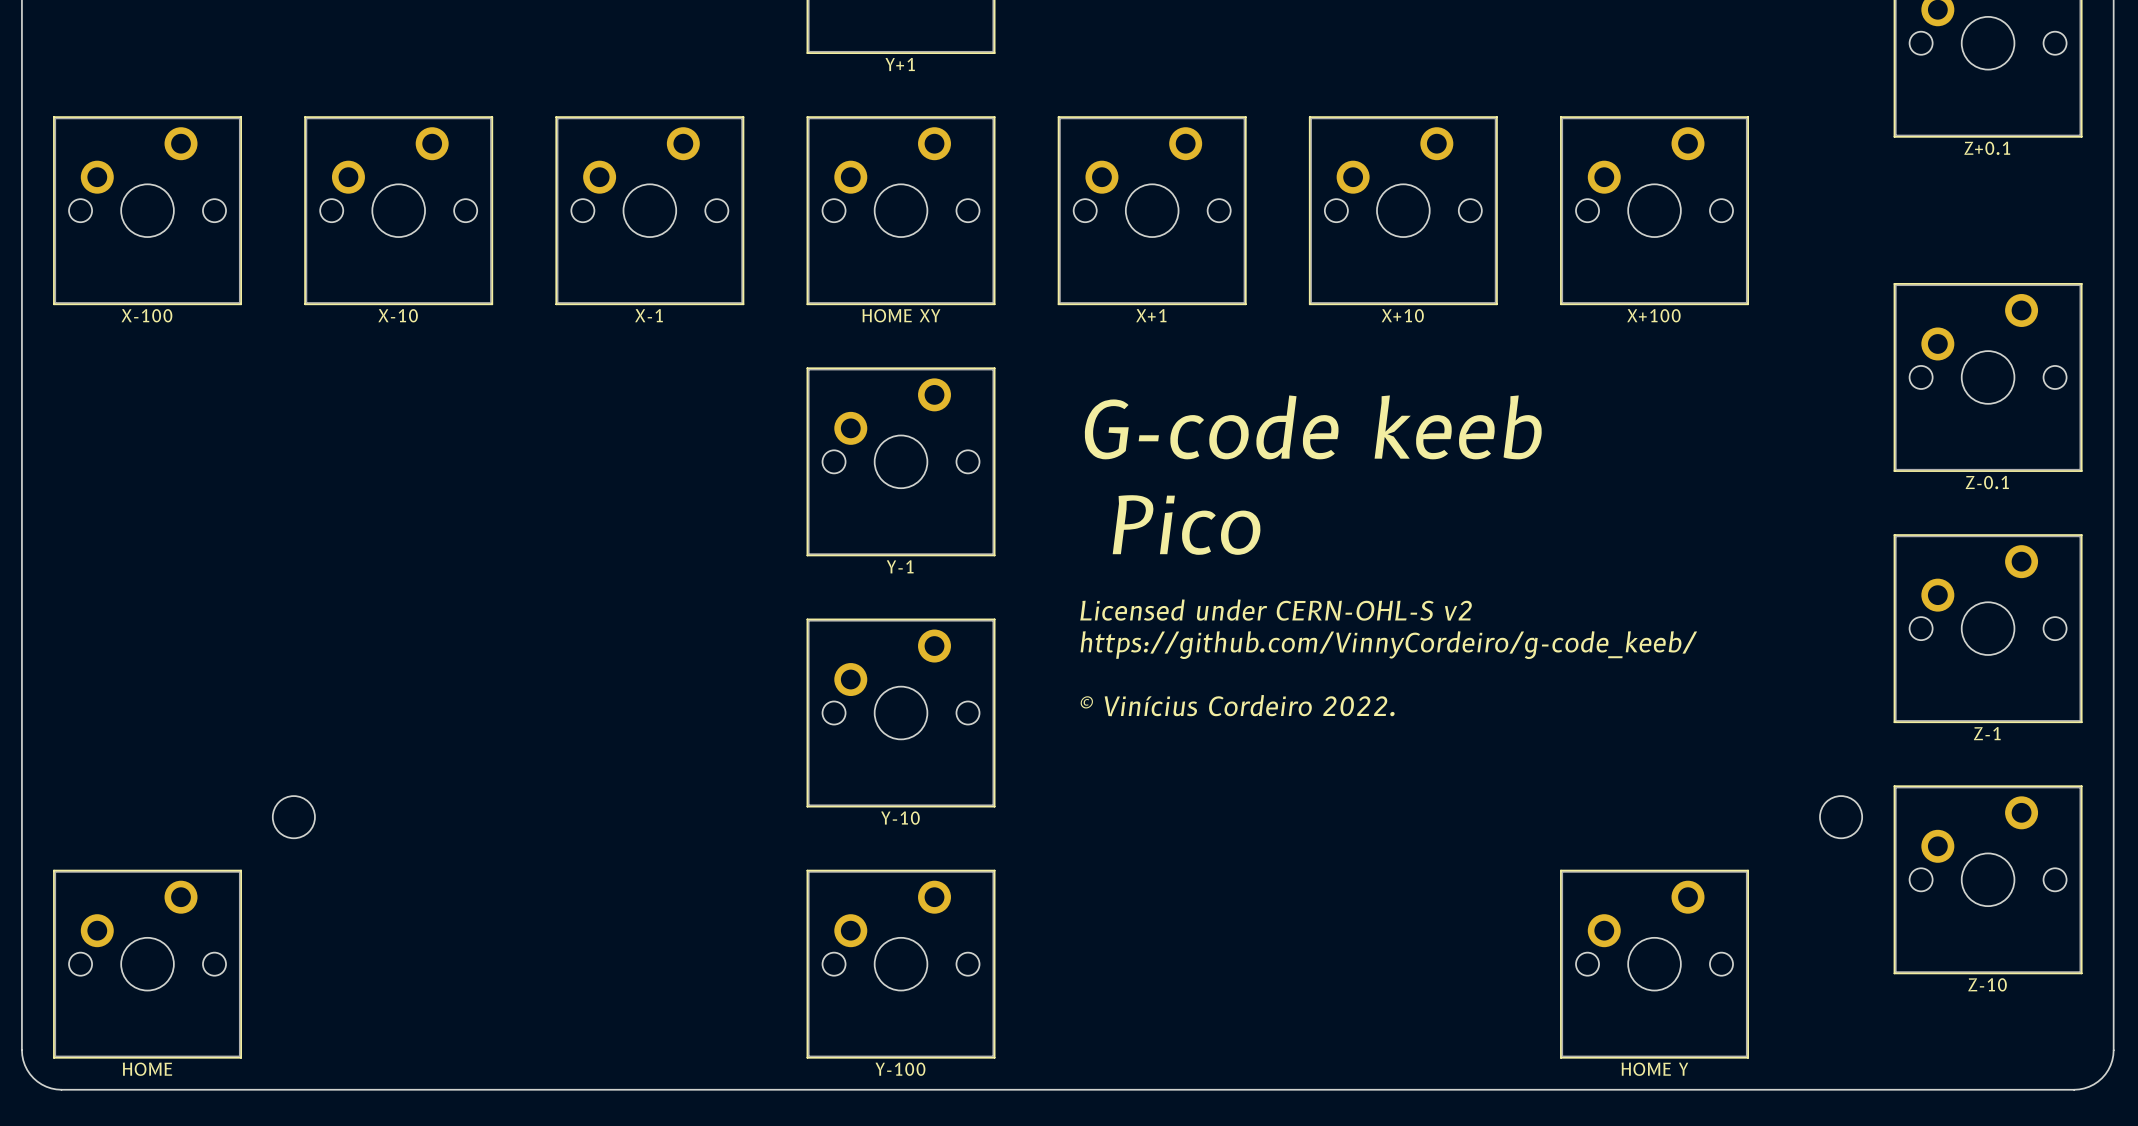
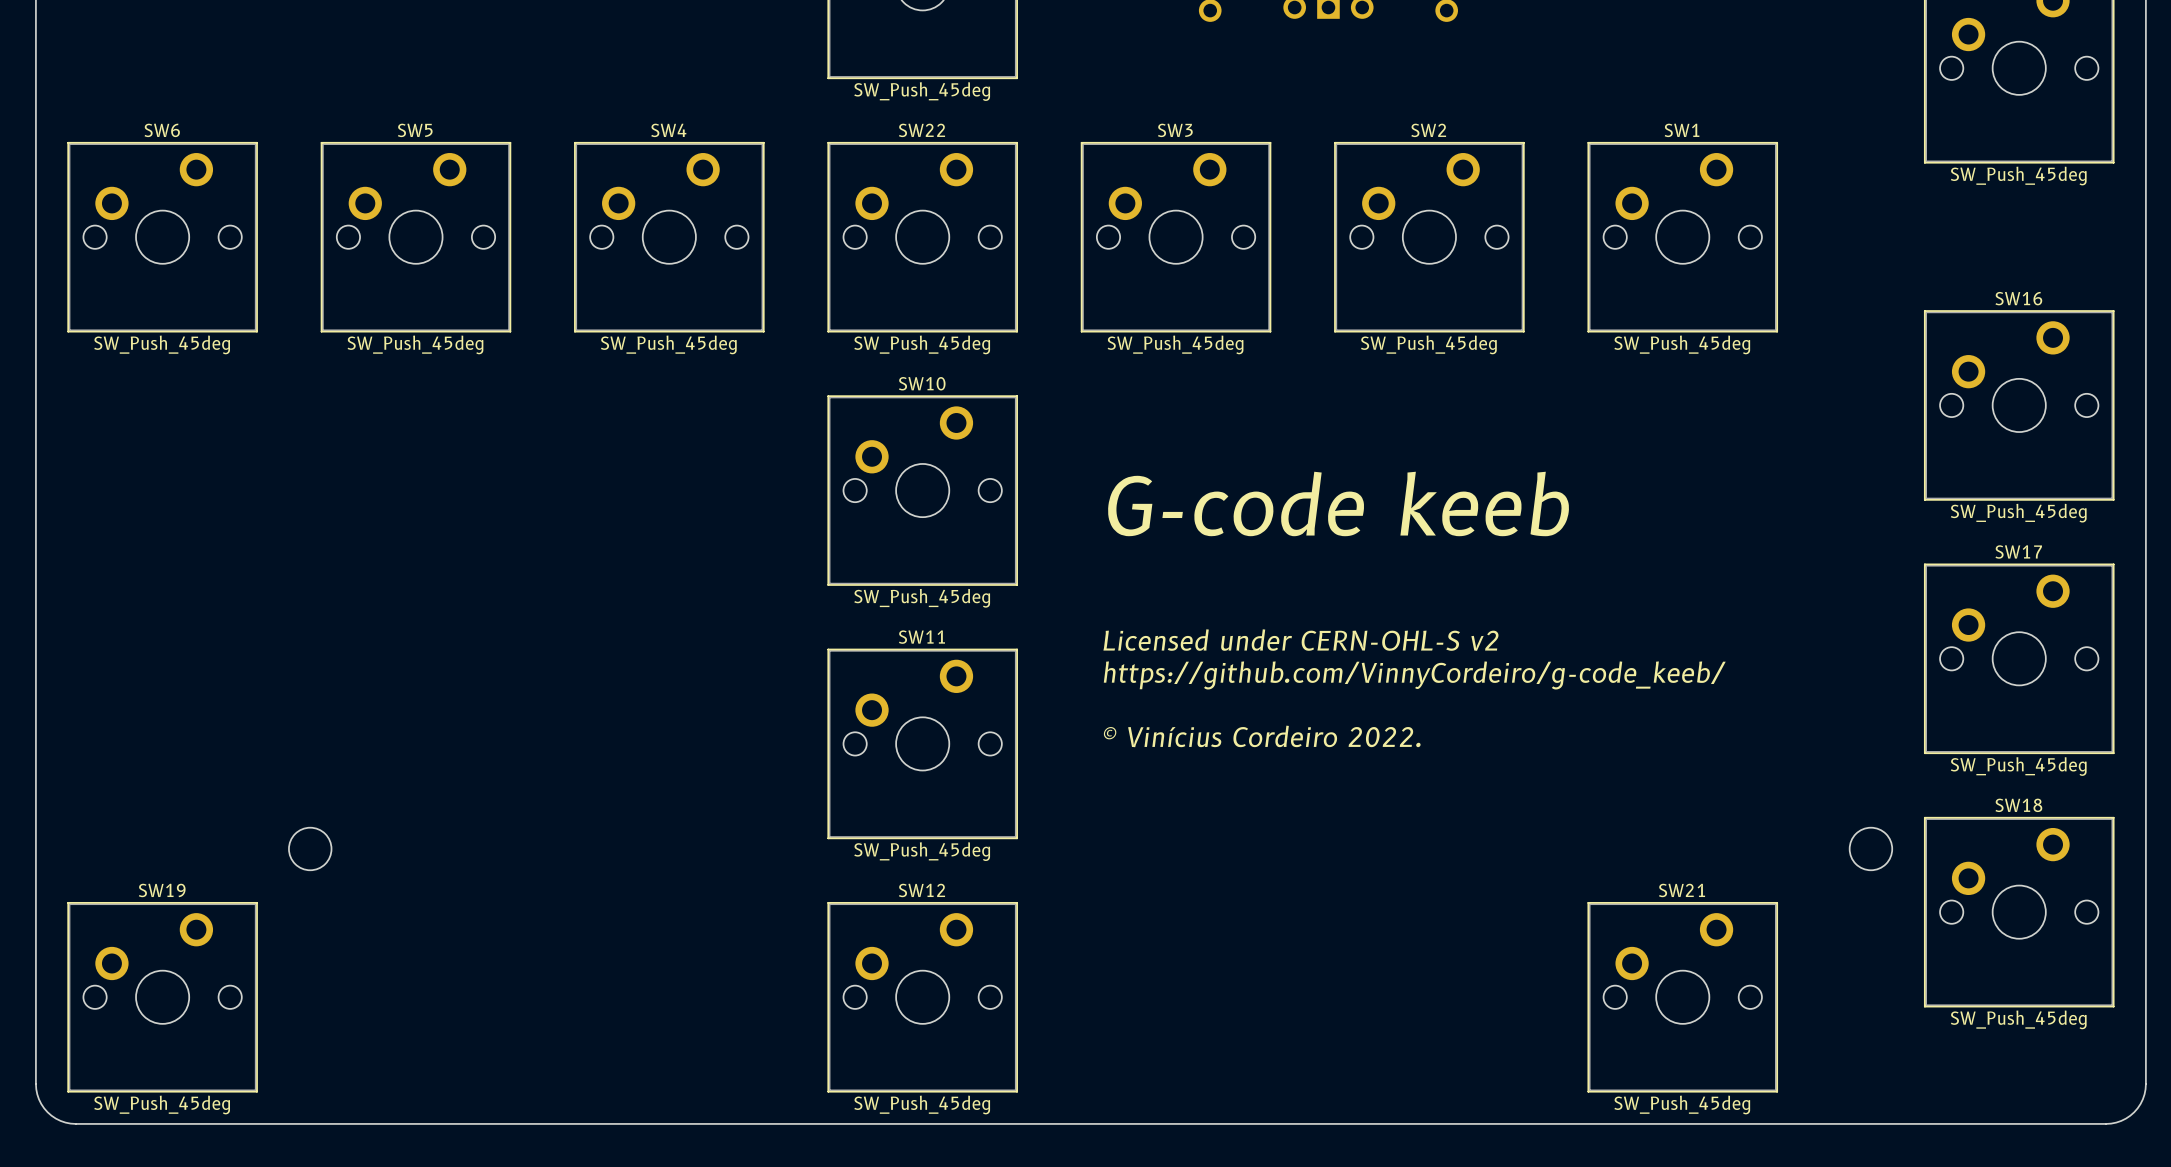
part value: Y+1 (900, 64) -> SW_Push_45deg (922, 91)
SW6 name: none -> SW6 (162, 130)
SW5 name: none -> SW5 (415, 130)
SW4 name: none -> SW4 (668, 130)
SW22 name: none -> SW22 (921, 130)
SW3 name: none -> SW3 (1175, 130)
SW2 name: none -> SW2 (1428, 130)
SW1 name: none -> SW1 (1682, 130)
part value: Z+0.1 (1987, 148) -> SW_Push_45deg (2018, 176)
SW16 name: none -> SW16 (2018, 298)
SW6 value: X-100 (146, 315) -> SW_Push_45deg (162, 344)
SW5 value: X-10 (398, 315) -> SW_Push_45deg (415, 344)
SW4 value: X-1 (649, 315) -> SW_Push_45deg (668, 344)
SW22 value: HOME XY (901, 315) -> SW_Push_45deg (922, 344)
SW3 value: X+1 (1151, 315) -> SW_Push_45deg (1175, 344)
SW2 value: X+10 (1402, 315) -> SW_Push_45deg (1428, 344)
SW1 value: X+100 (1653, 315) -> SW_Push_45deg (1682, 344)
SW10 name: none -> SW10 (922, 383)
text position: G-code keeb (1313, 427) -> G-code keeb (1338, 503)
SW16 value: Z-0.1 (1987, 482) -> SW_Push_45deg (2018, 513)
SW17 name: none -> SW17 (2018, 551)
text: Pico (1186, 525) -> none
SW10 value: Y-1 (900, 566) -> SW_Push_45deg (922, 598)
SW11 name: none -> SW11 (921, 637)
SW17 value: Z-1 (1987, 733) -> SW_Push_45deg (2018, 766)
SW18 name: none -> SW18 (2018, 805)
SW11 value: Y-10 (900, 818) -> SW_Push_45deg (922, 851)
SW19 name: none -> SW19 (162, 890)
SW12 name: none -> SW12 (921, 890)
SW21 name: none -> SW21 (1682, 890)
SW18 value: Z-10 (1987, 984) -> SW_Push_45deg (2018, 1019)
SW19 value: HOME (147, 1069) -> SW_Push_45deg (162, 1105)
SW12 value: Y-100 (900, 1069) -> SW_Push_45deg (922, 1105)
SW21 value: HOME Y (1654, 1069) -> SW_Push_45deg (1682, 1105)

